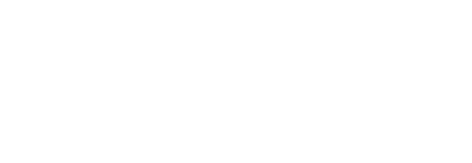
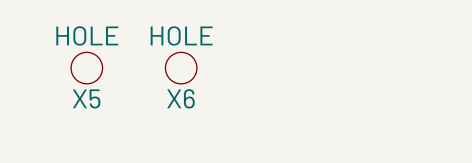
X5: none -> HOLE (86, 68)
X6: none -> HOLE (181, 68)

